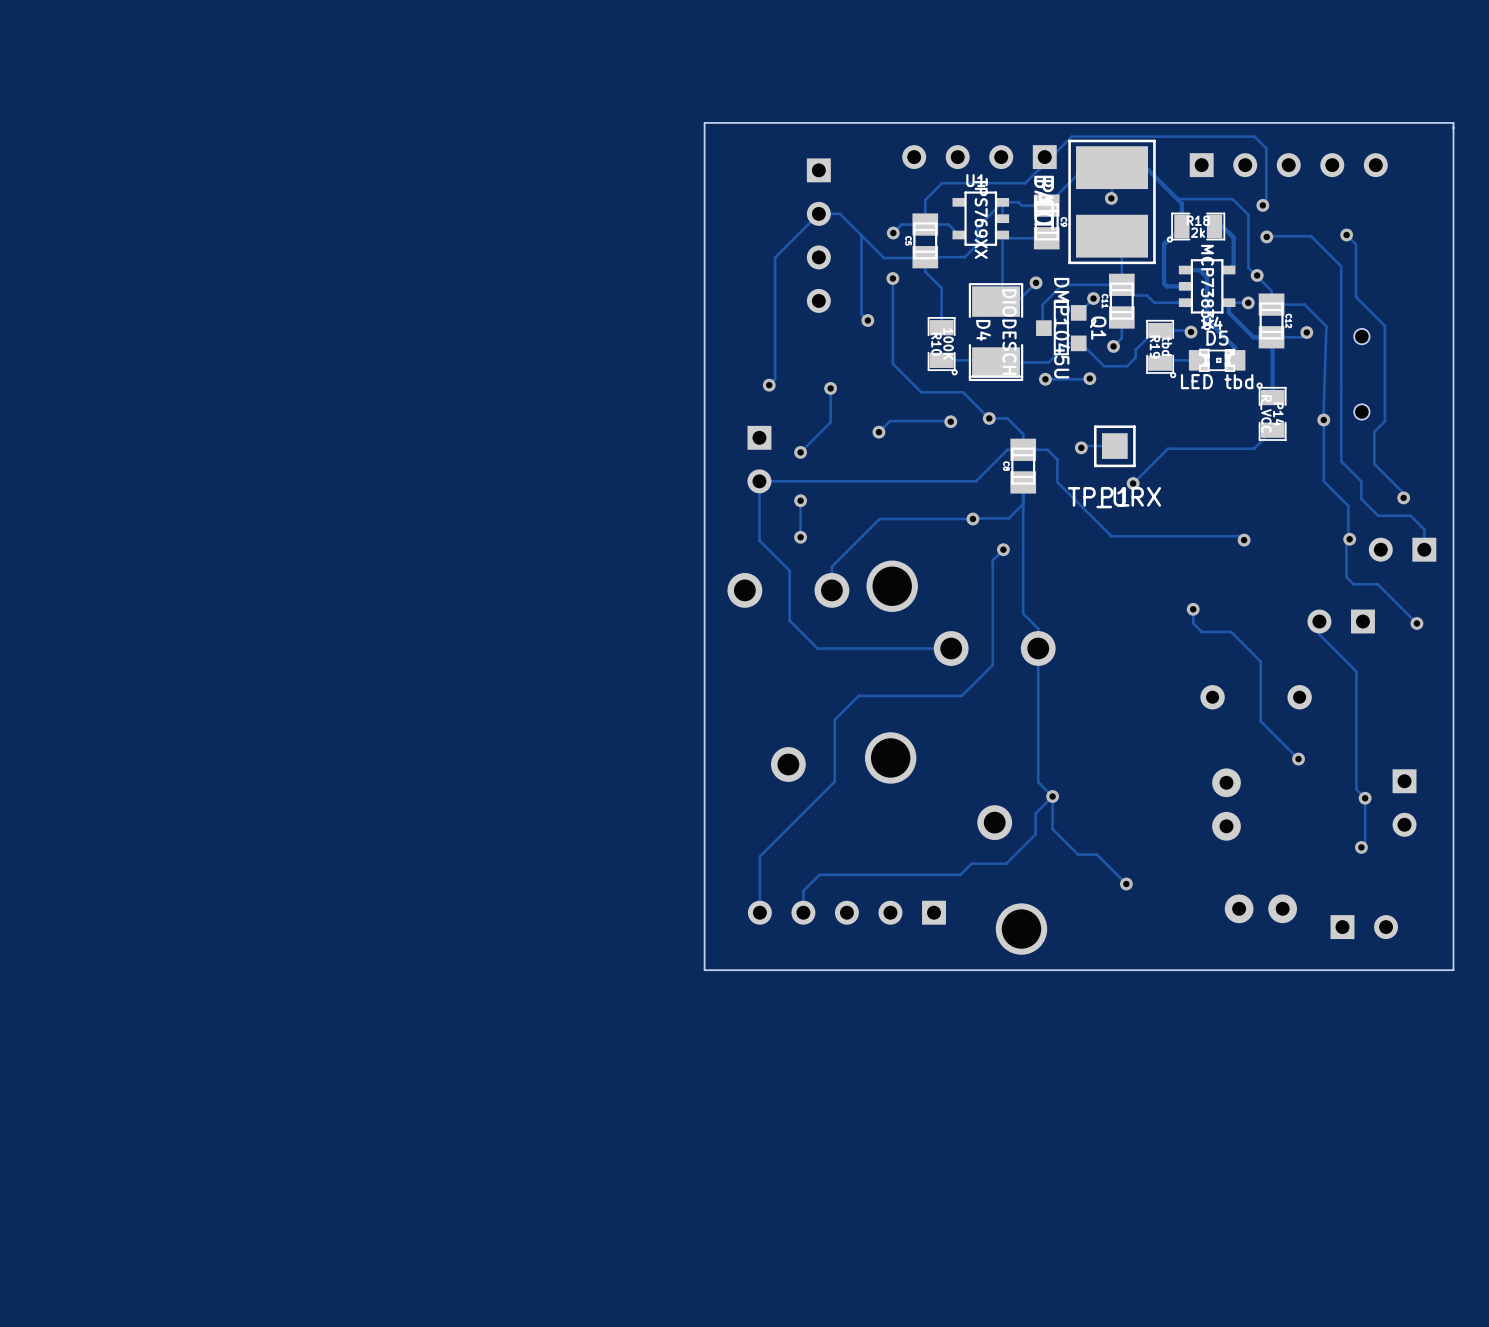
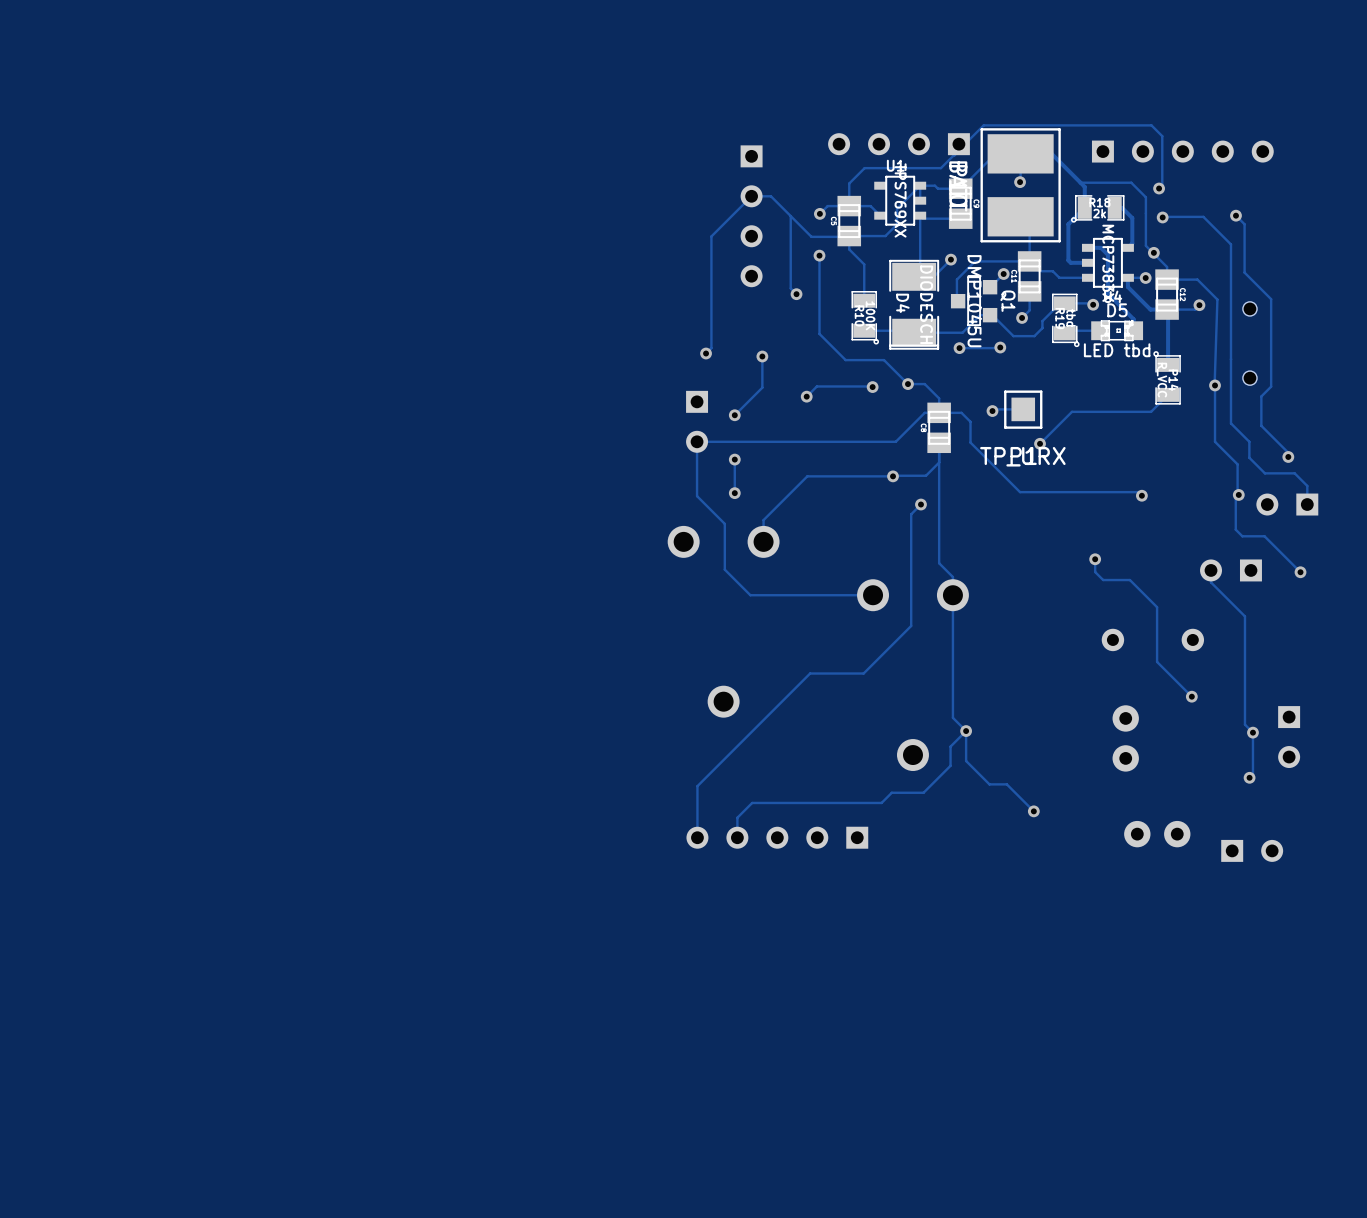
board edge: (1453, 122) (1453, 970) (704, 970) (704, 122) (1453, 122) -> none
part: (892, 586) -> none
track: (992, 665) (961, 695) (858, 695) (834, 719) (834, 781) -> (911, 610) (911, 625) (863, 673) (810, 673) (766, 717)
part: (890, 757) -> none
part: (1021, 929) -> none

